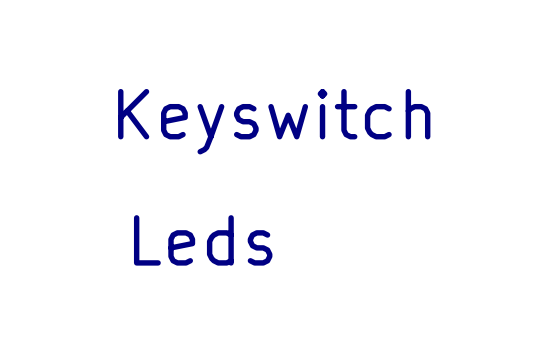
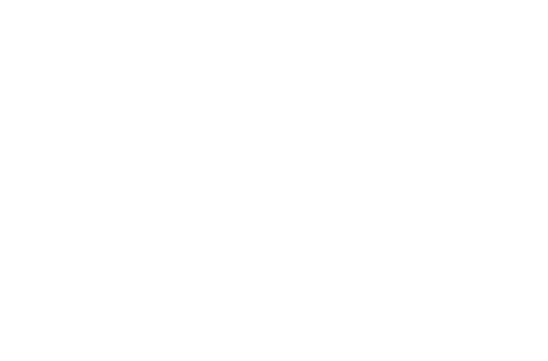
text: Keyswitch (274, 121) -> none
text: Leds (203, 240) -> none

